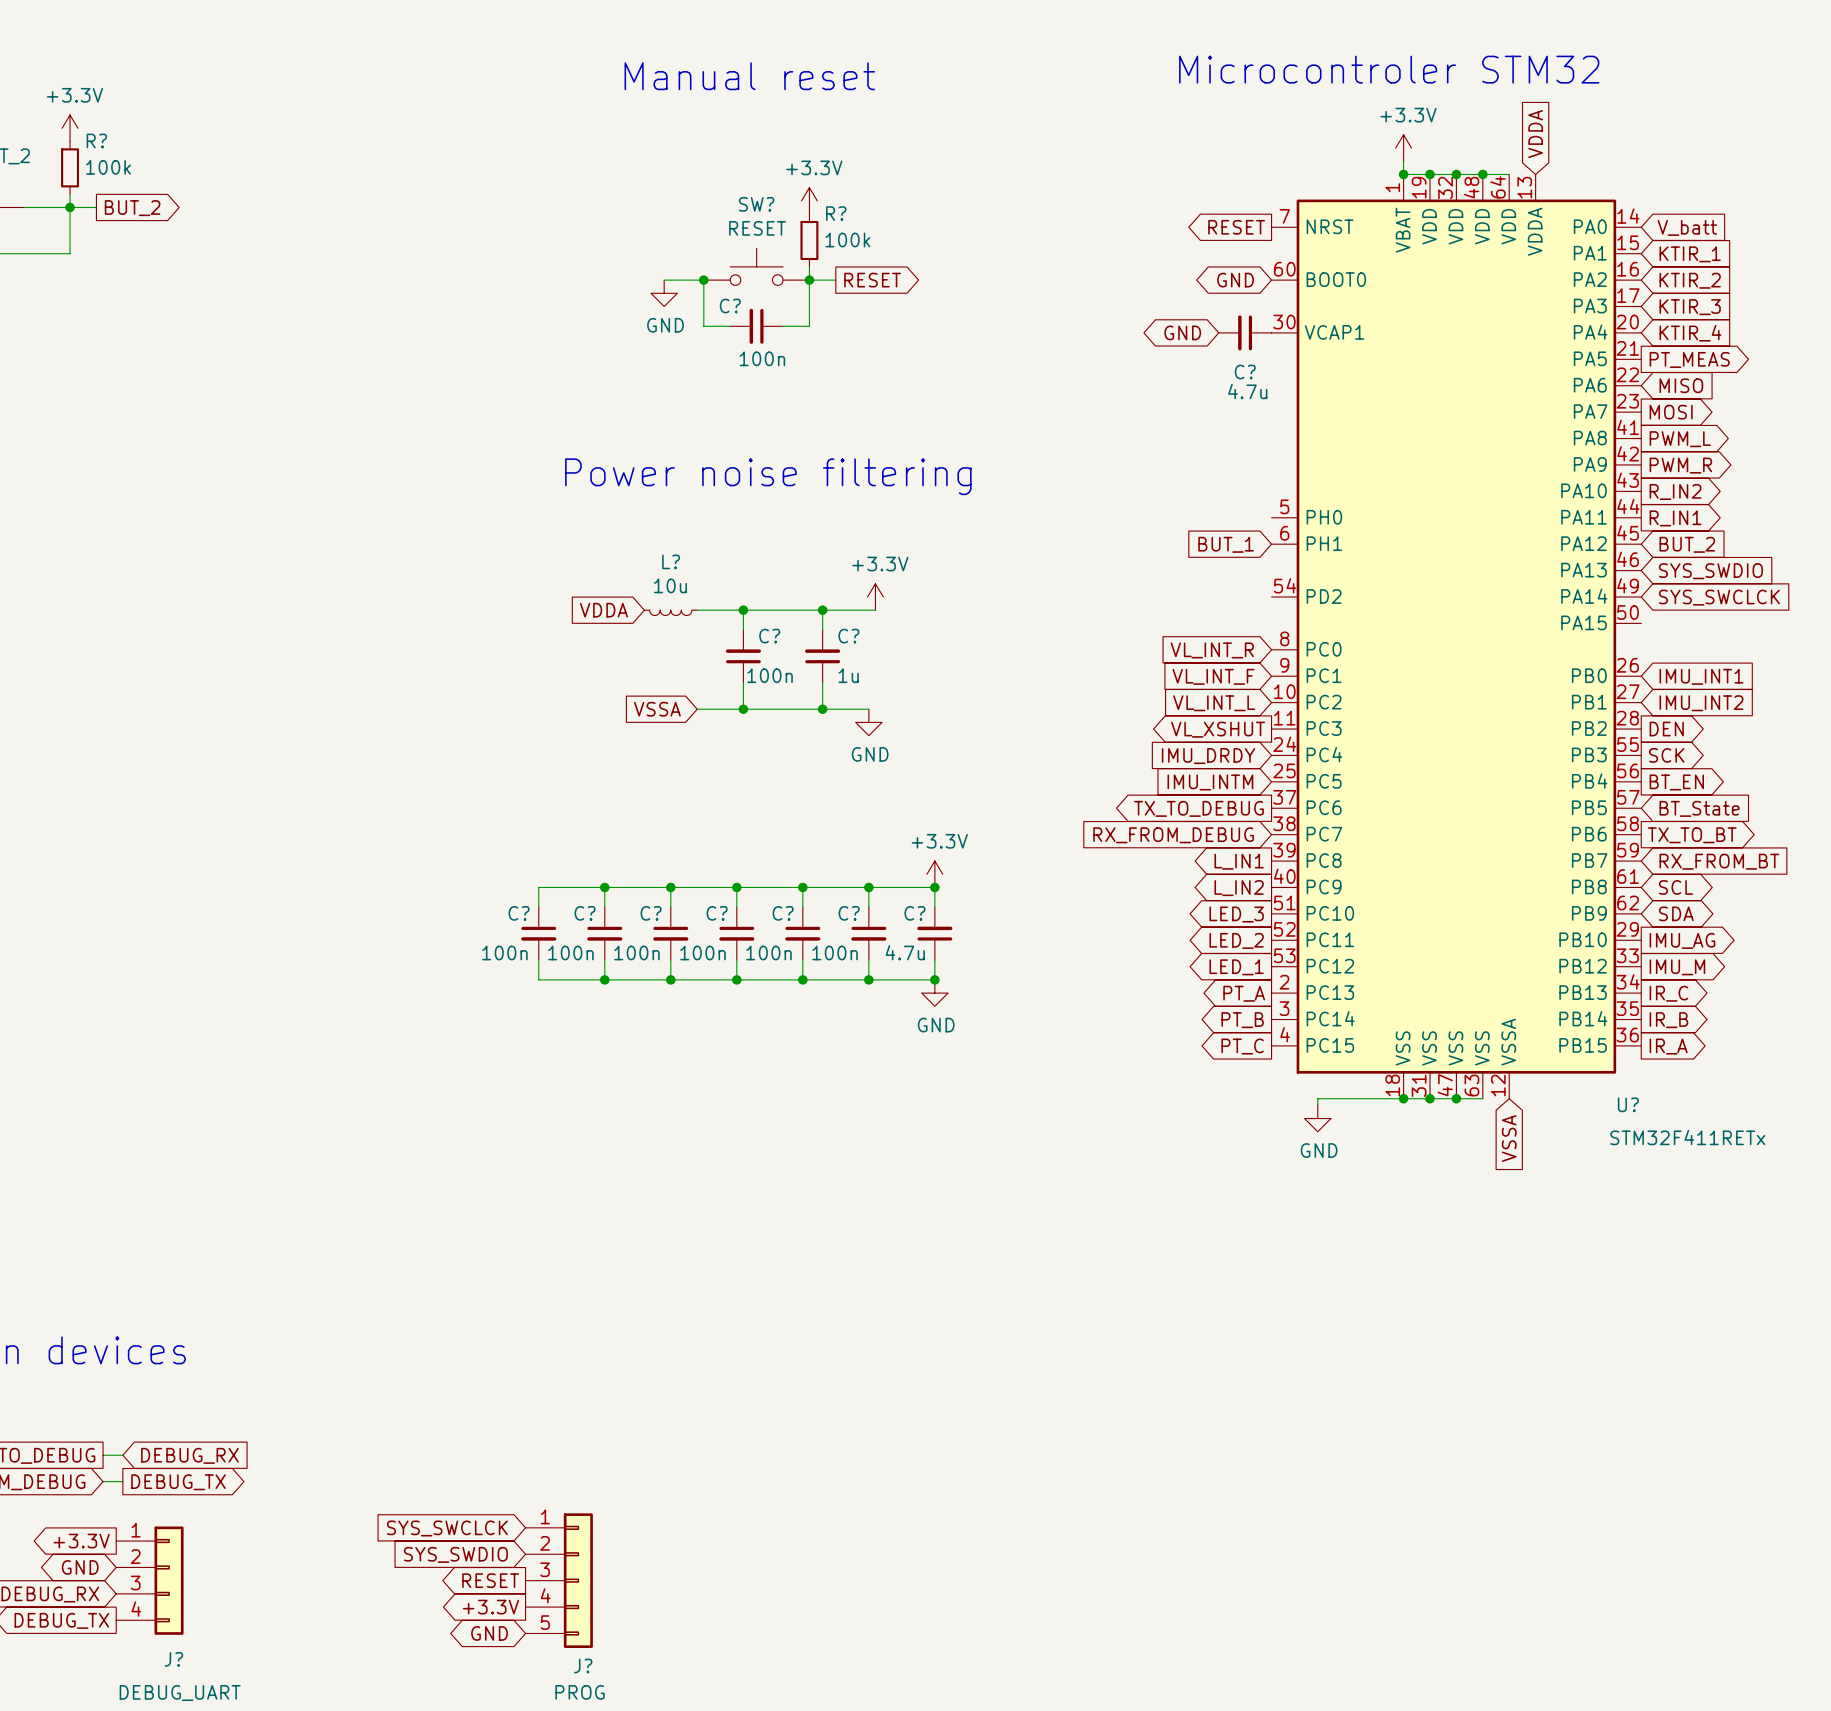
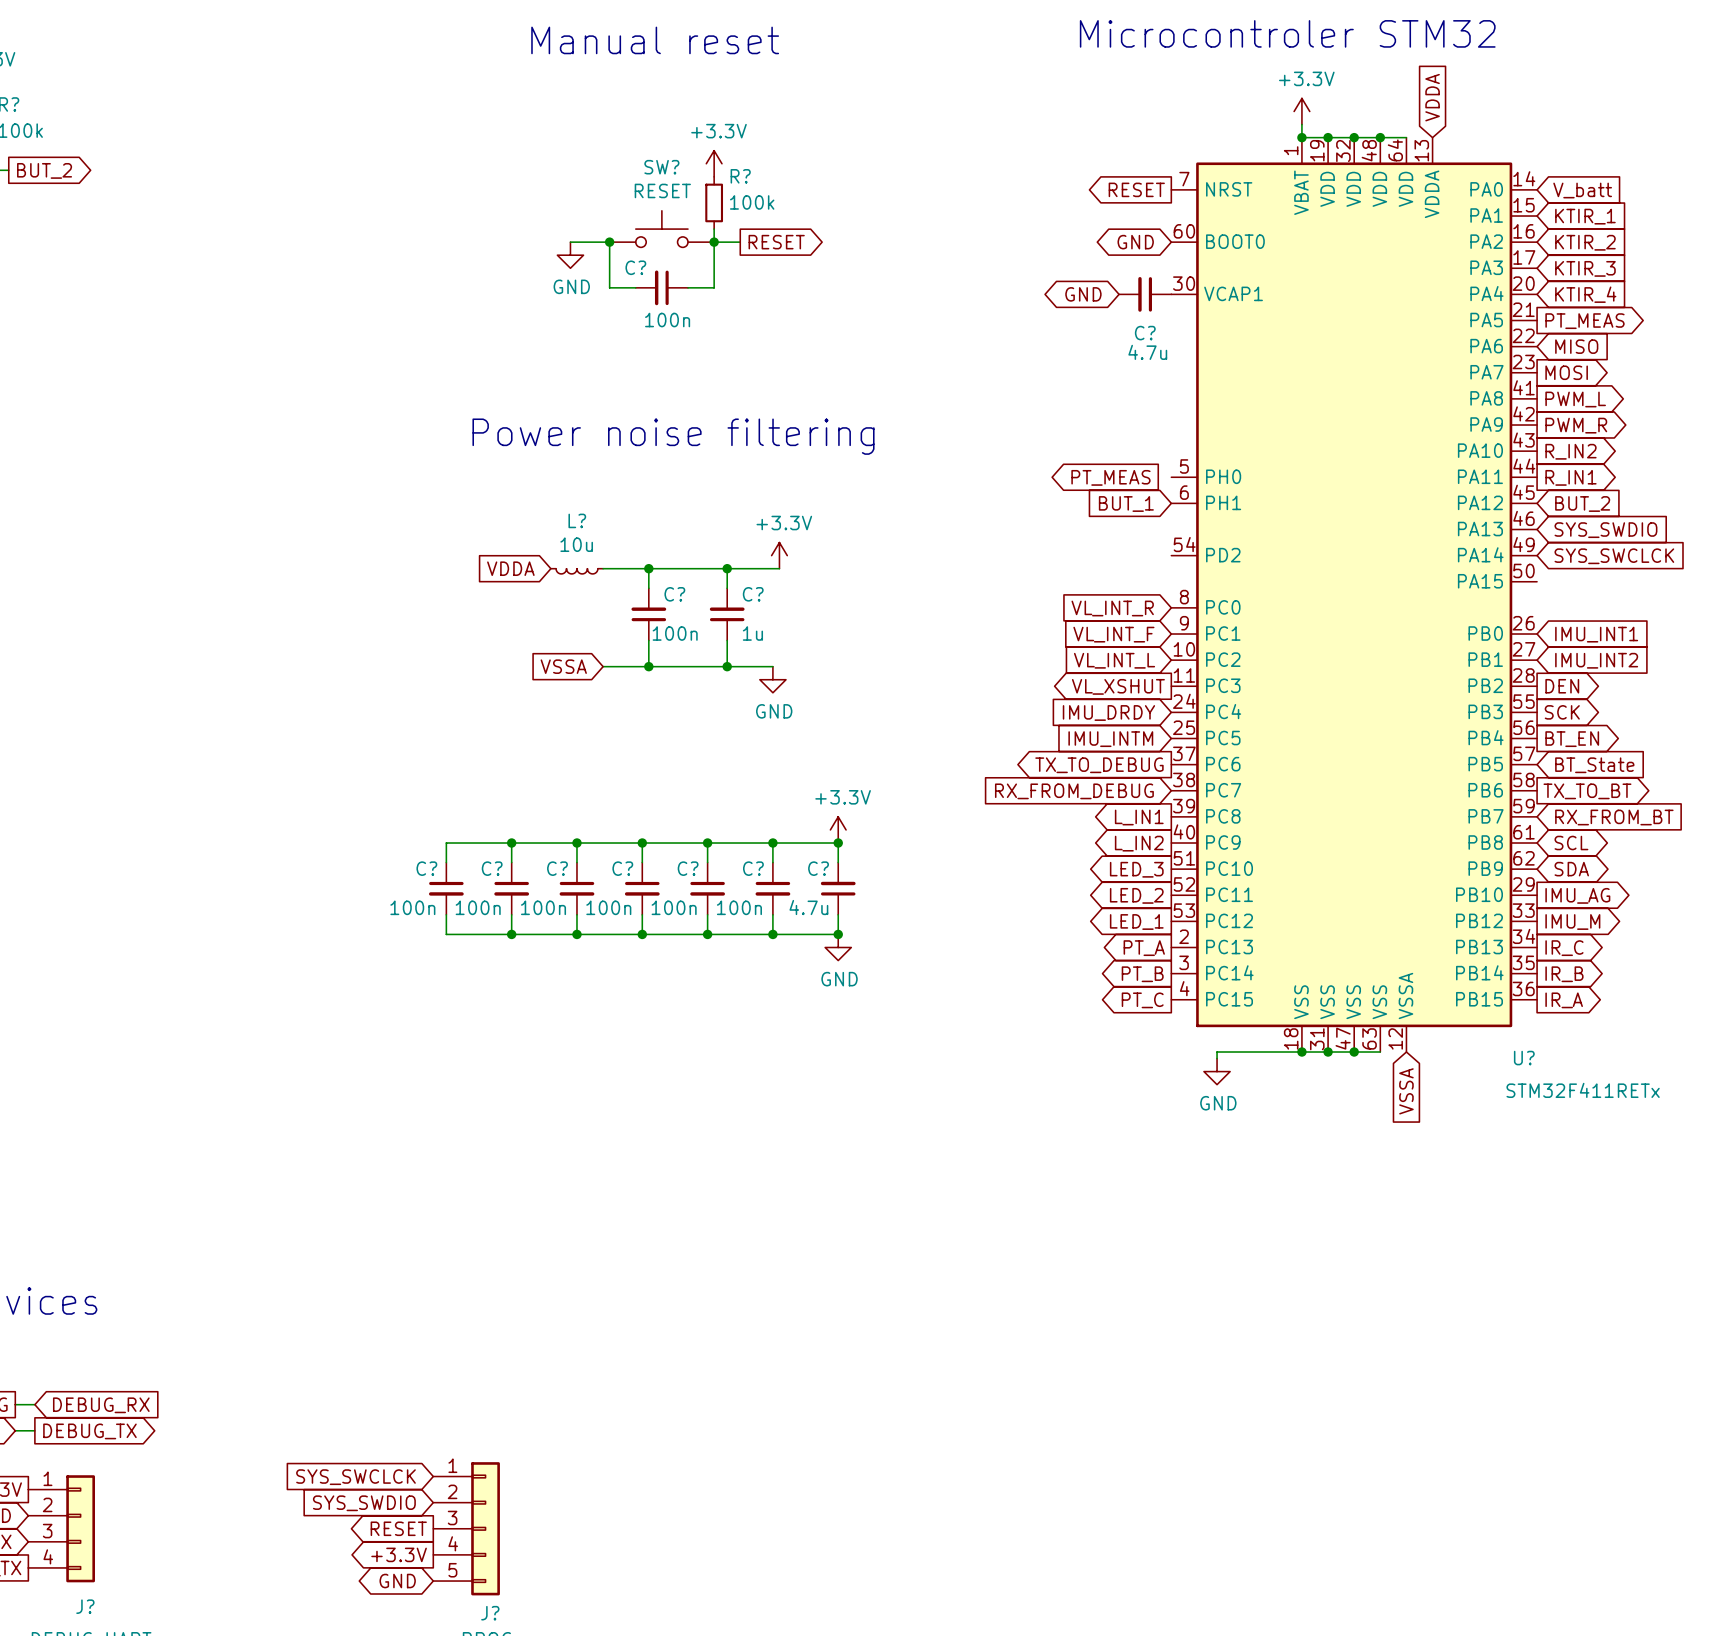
global label: none -> PT_MEAS (1110, 477)

